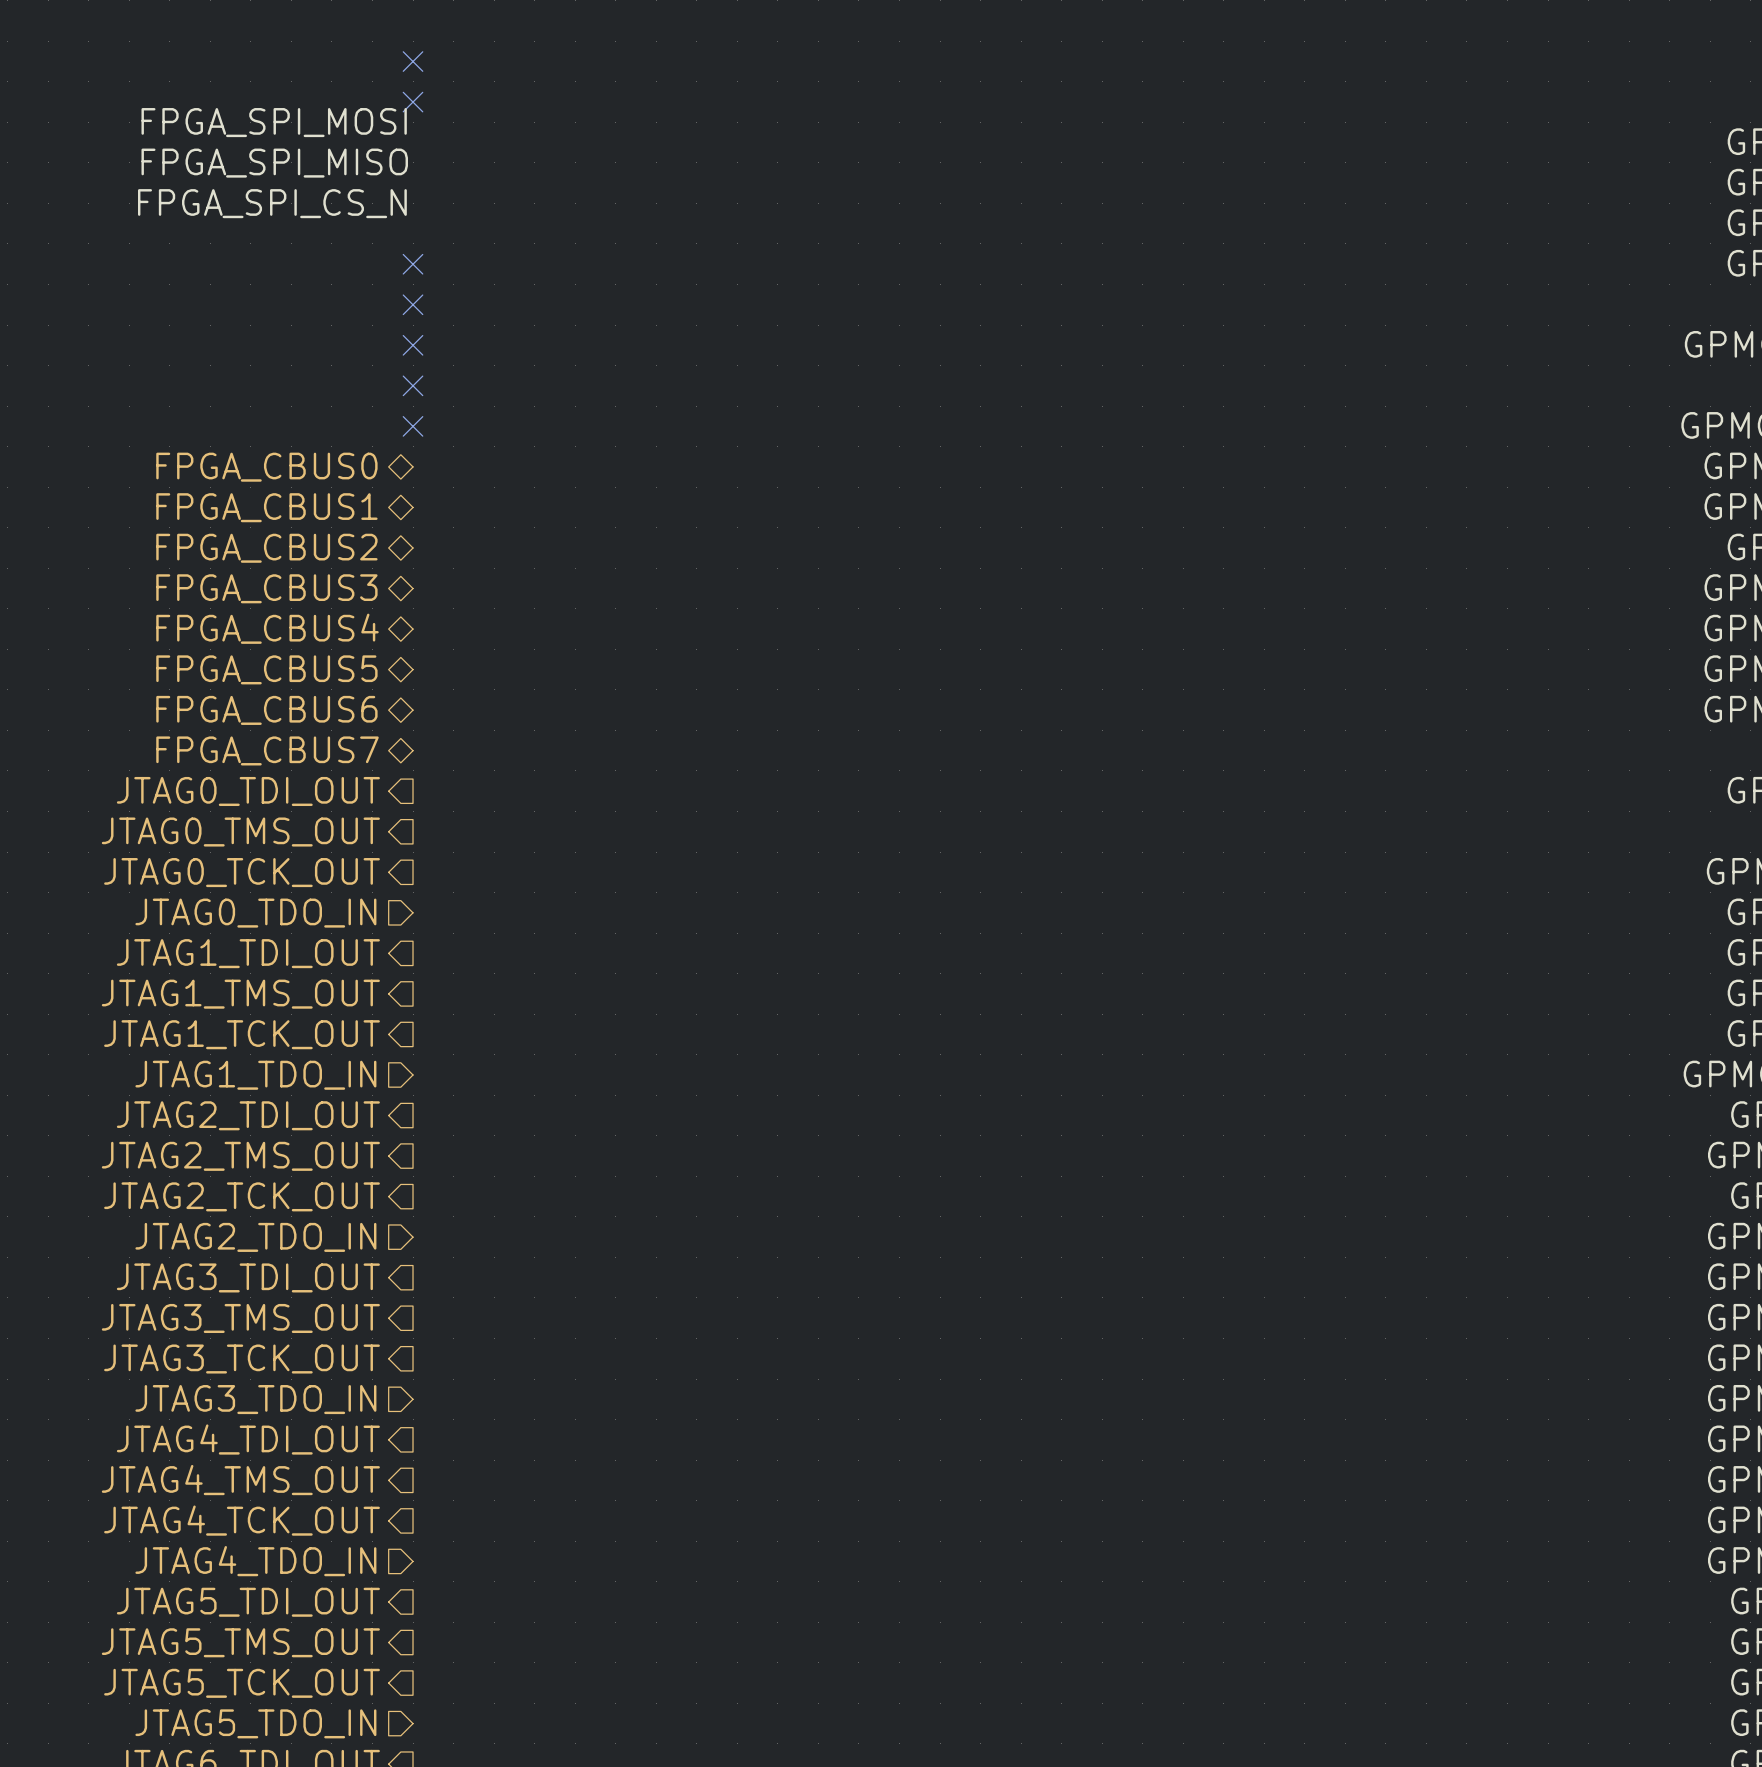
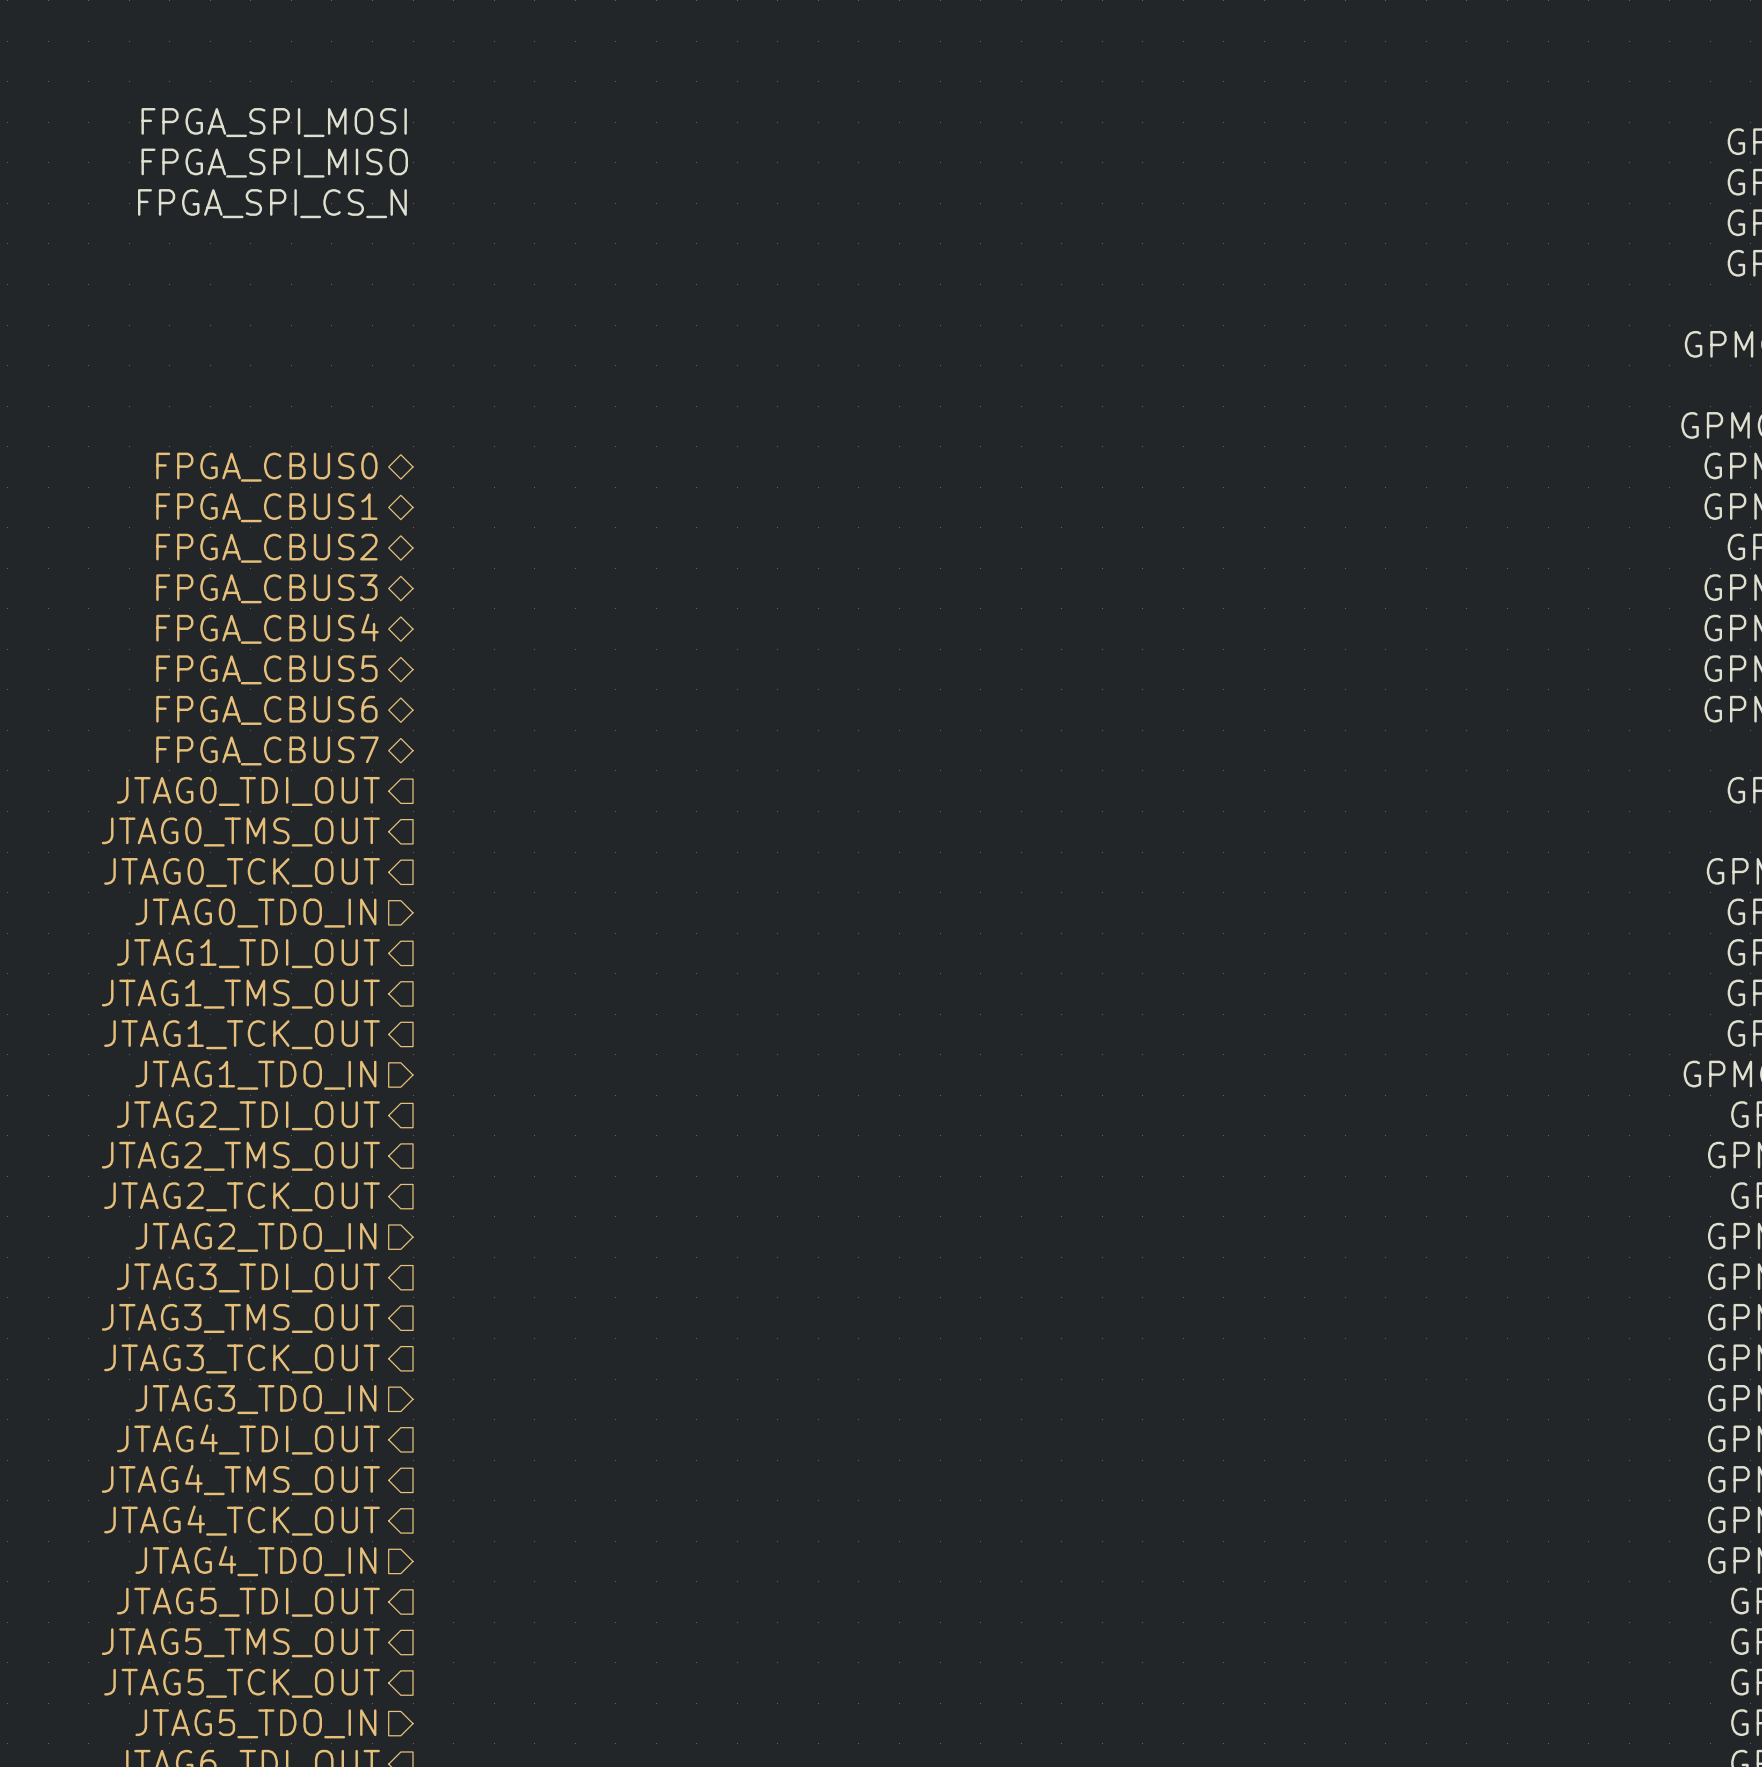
no-connect mark: (413, 61) -> none
no-connect mark: (413, 102) -> none
no-connect mark: (413, 264) -> none
no-connect mark: (413, 304) -> none
no-connect mark: (413, 345) -> none
no-connect mark: (413, 385) -> none
no-connect mark: (413, 426) -> none

